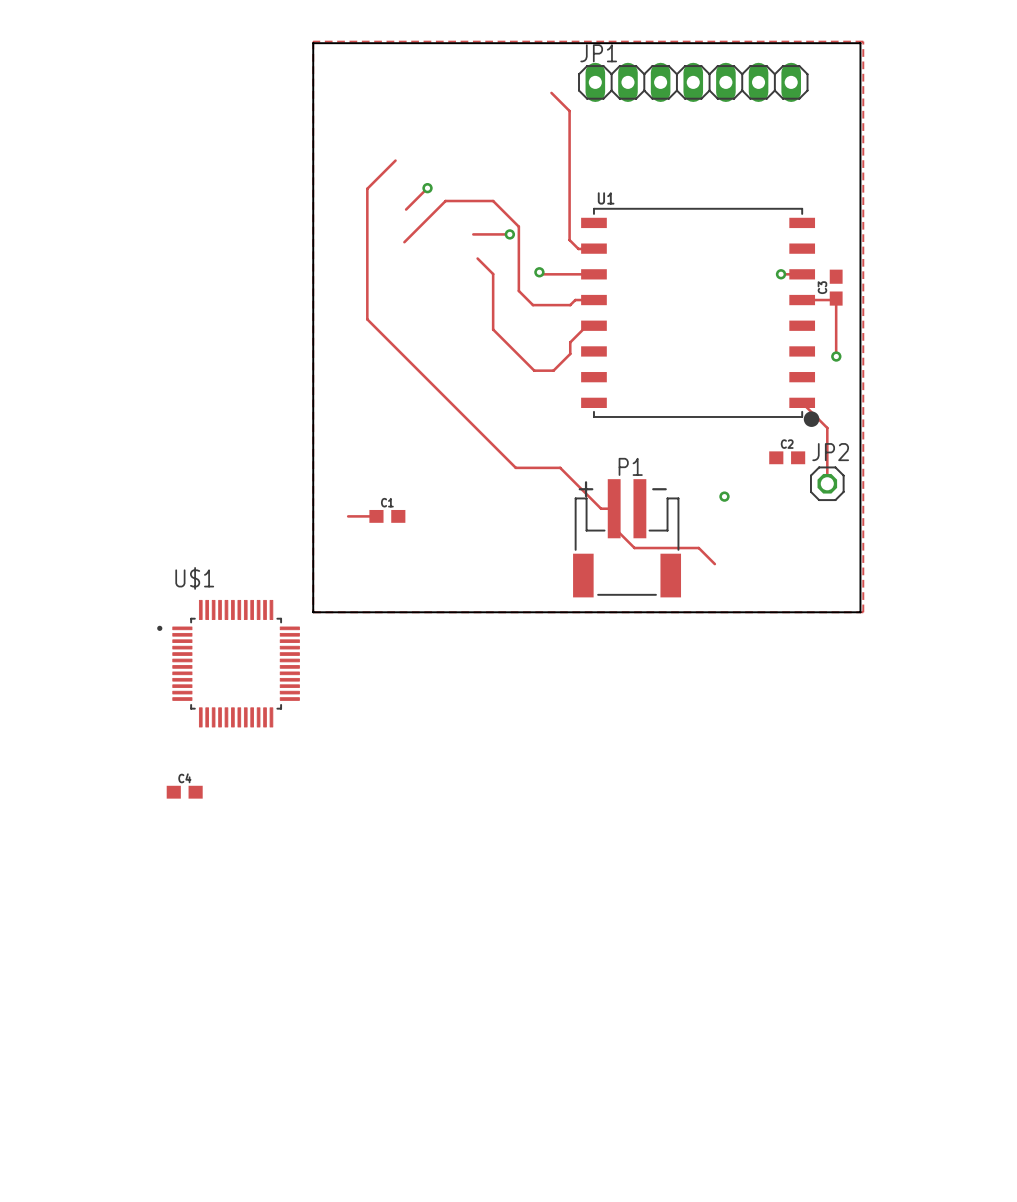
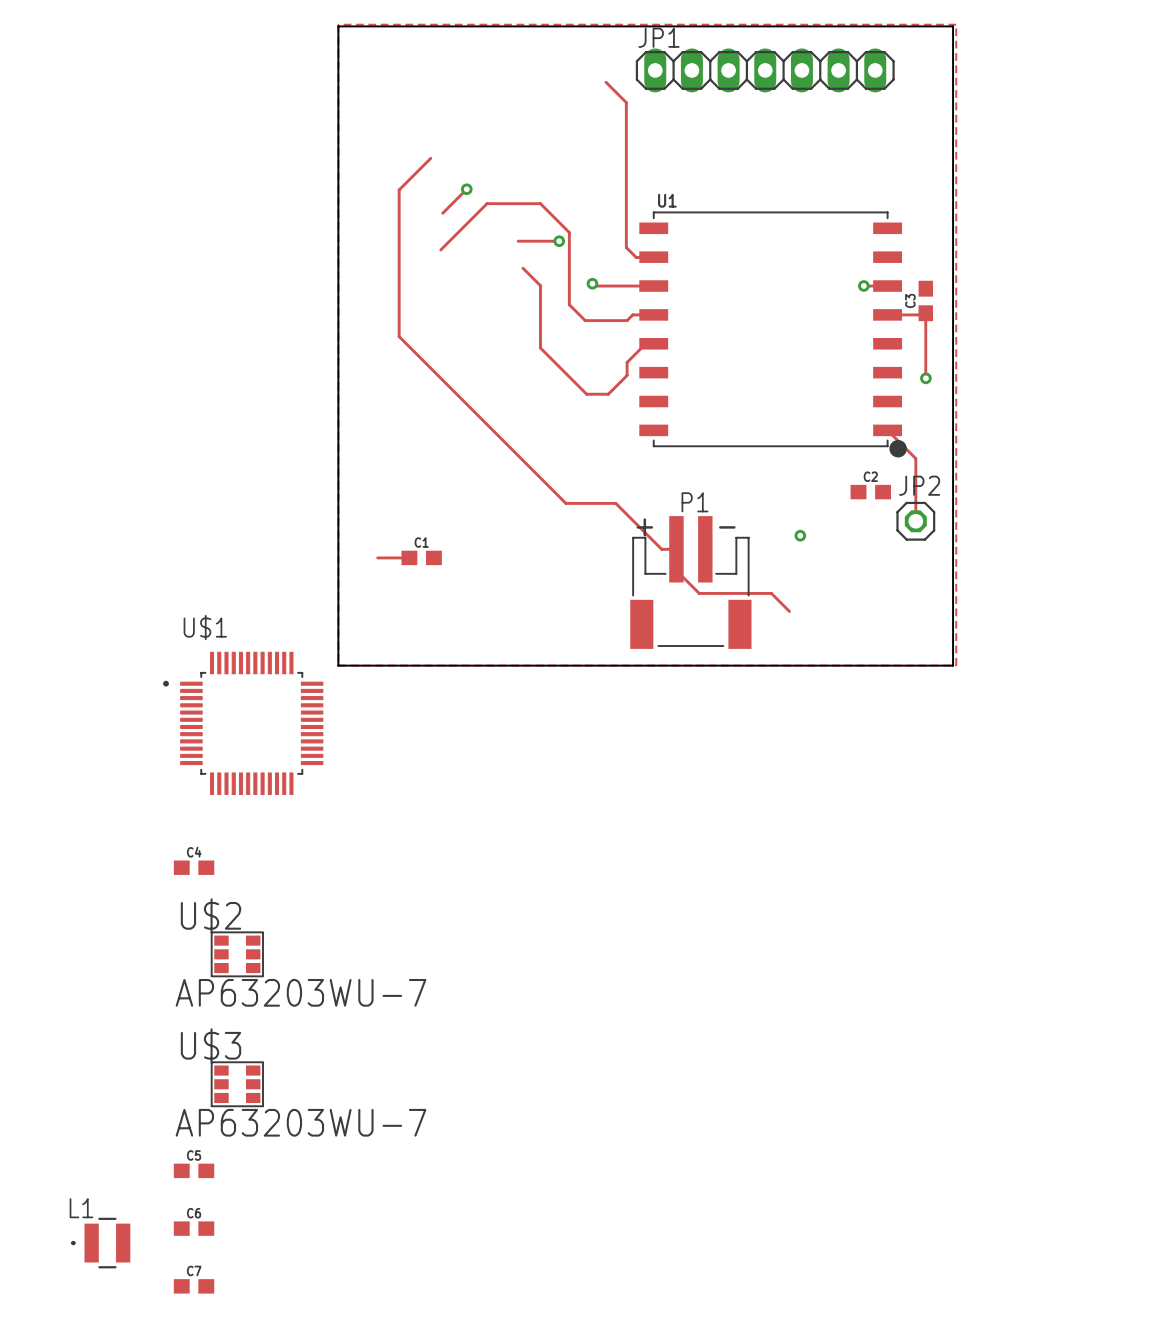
U$2: none -> AP63203WU-7 (237, 954)
U$3: none -> AP63203WU-7 (237, 1084)
C5: none -> (194, 1170)
C6: none -> (194, 1228)
L1: none -> (100, 1243)
C7: none -> (194, 1286)

